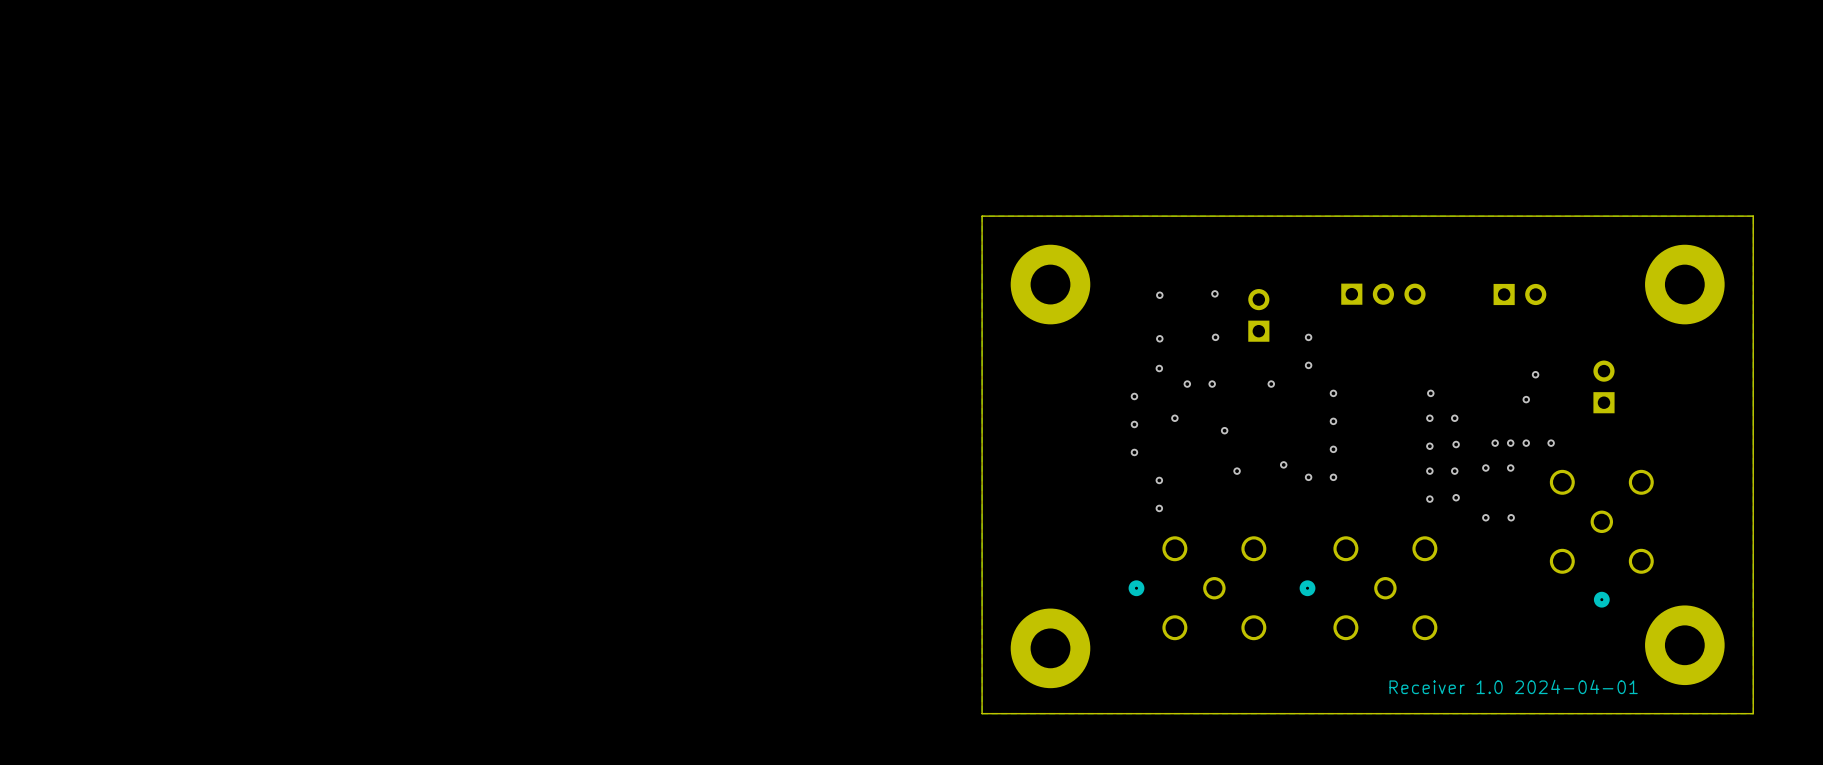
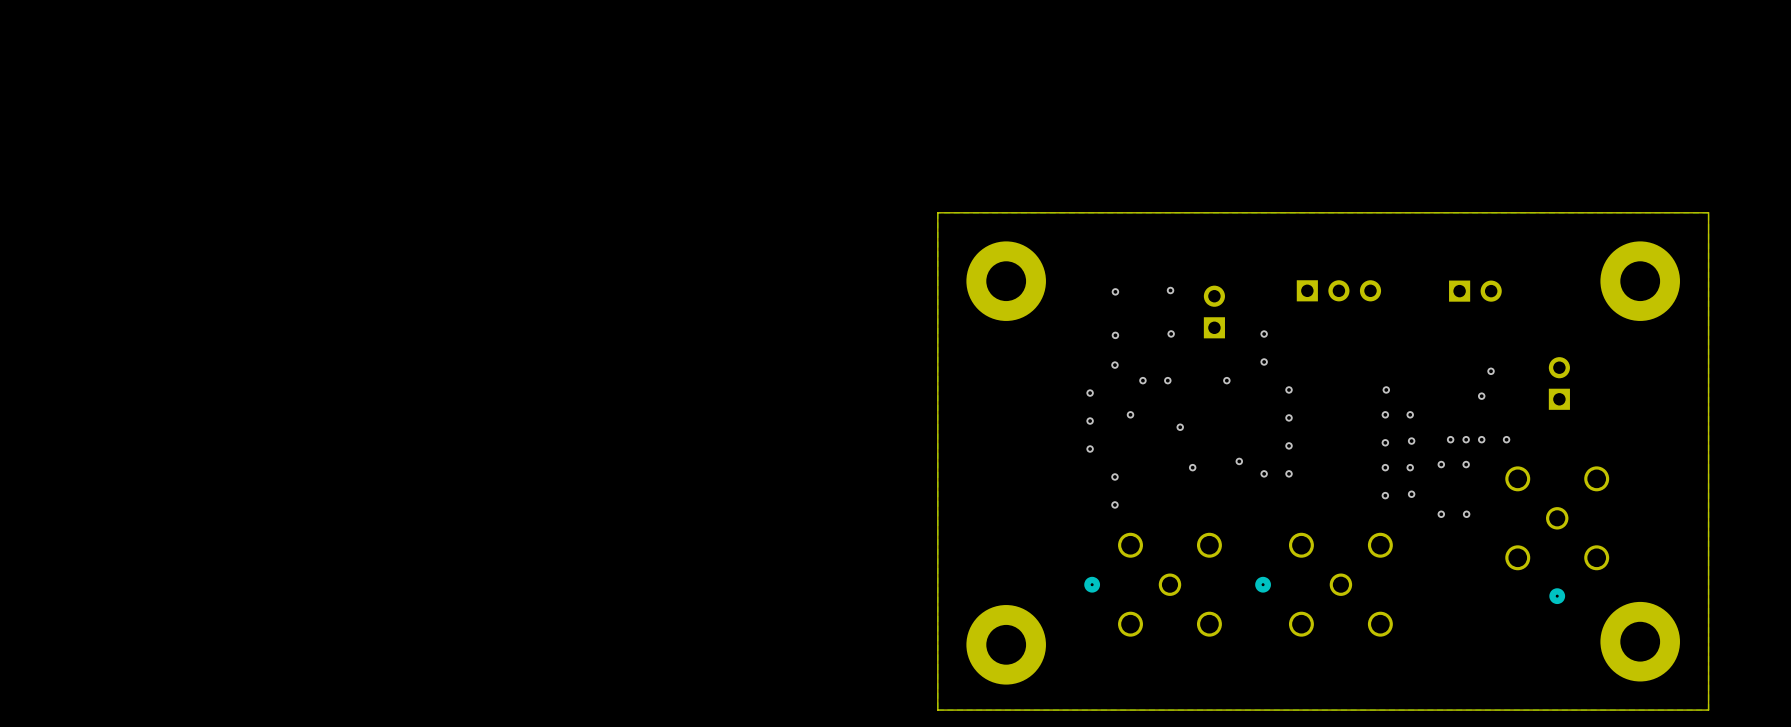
text: Receiver 1.0 2024-04-01 (1513, 686) -> none

